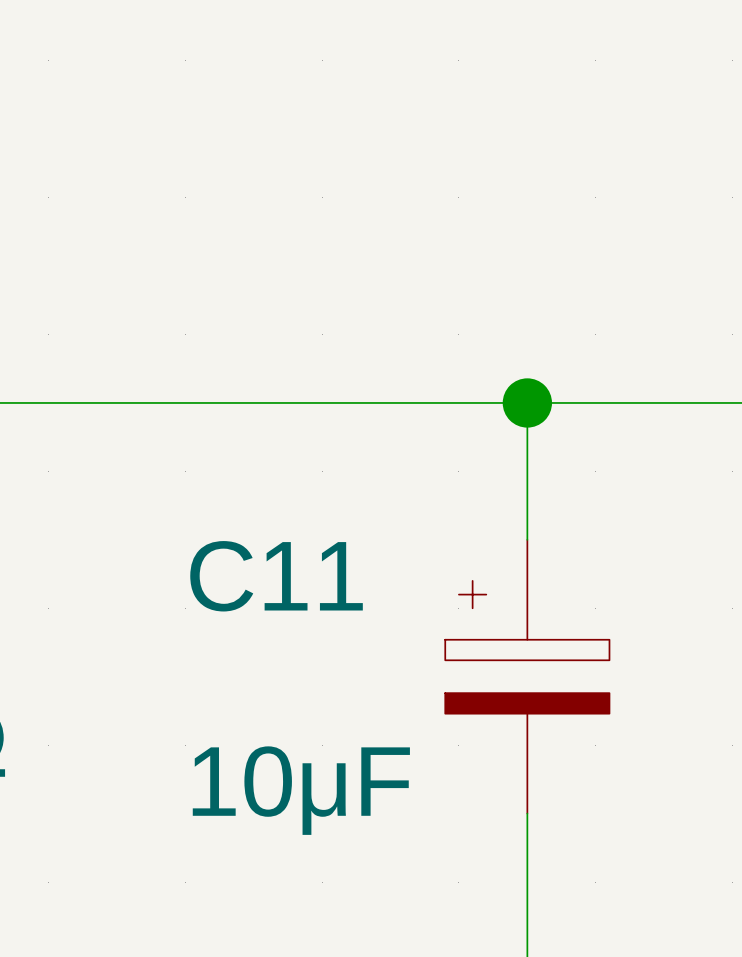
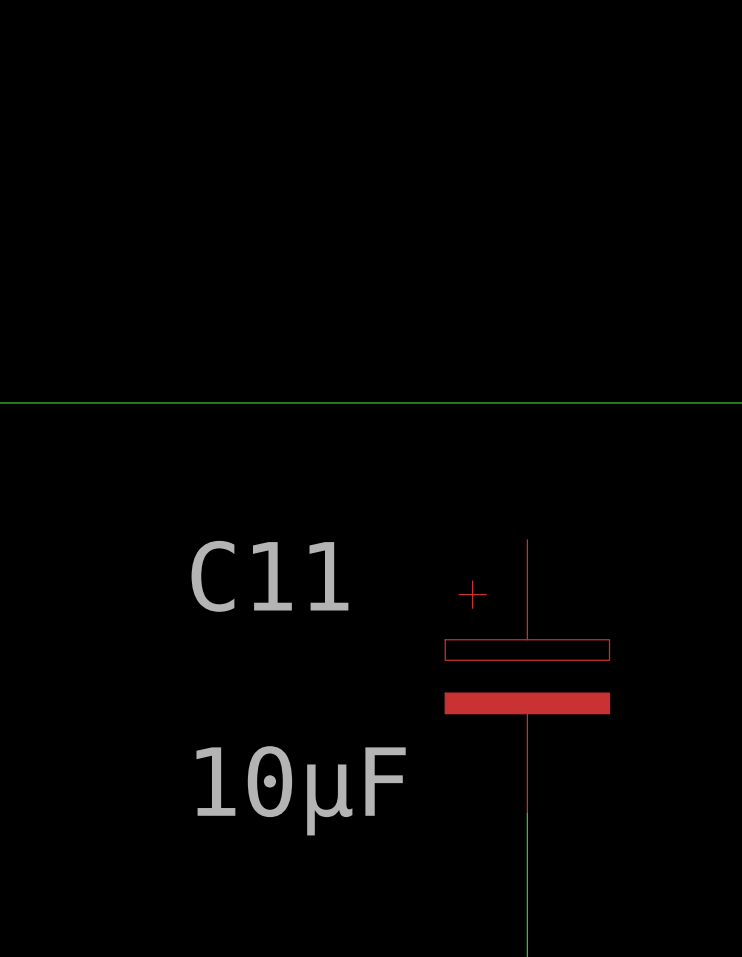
wire: (527, 402) (527, 539) -> none
junction: (527, 402) -> none

